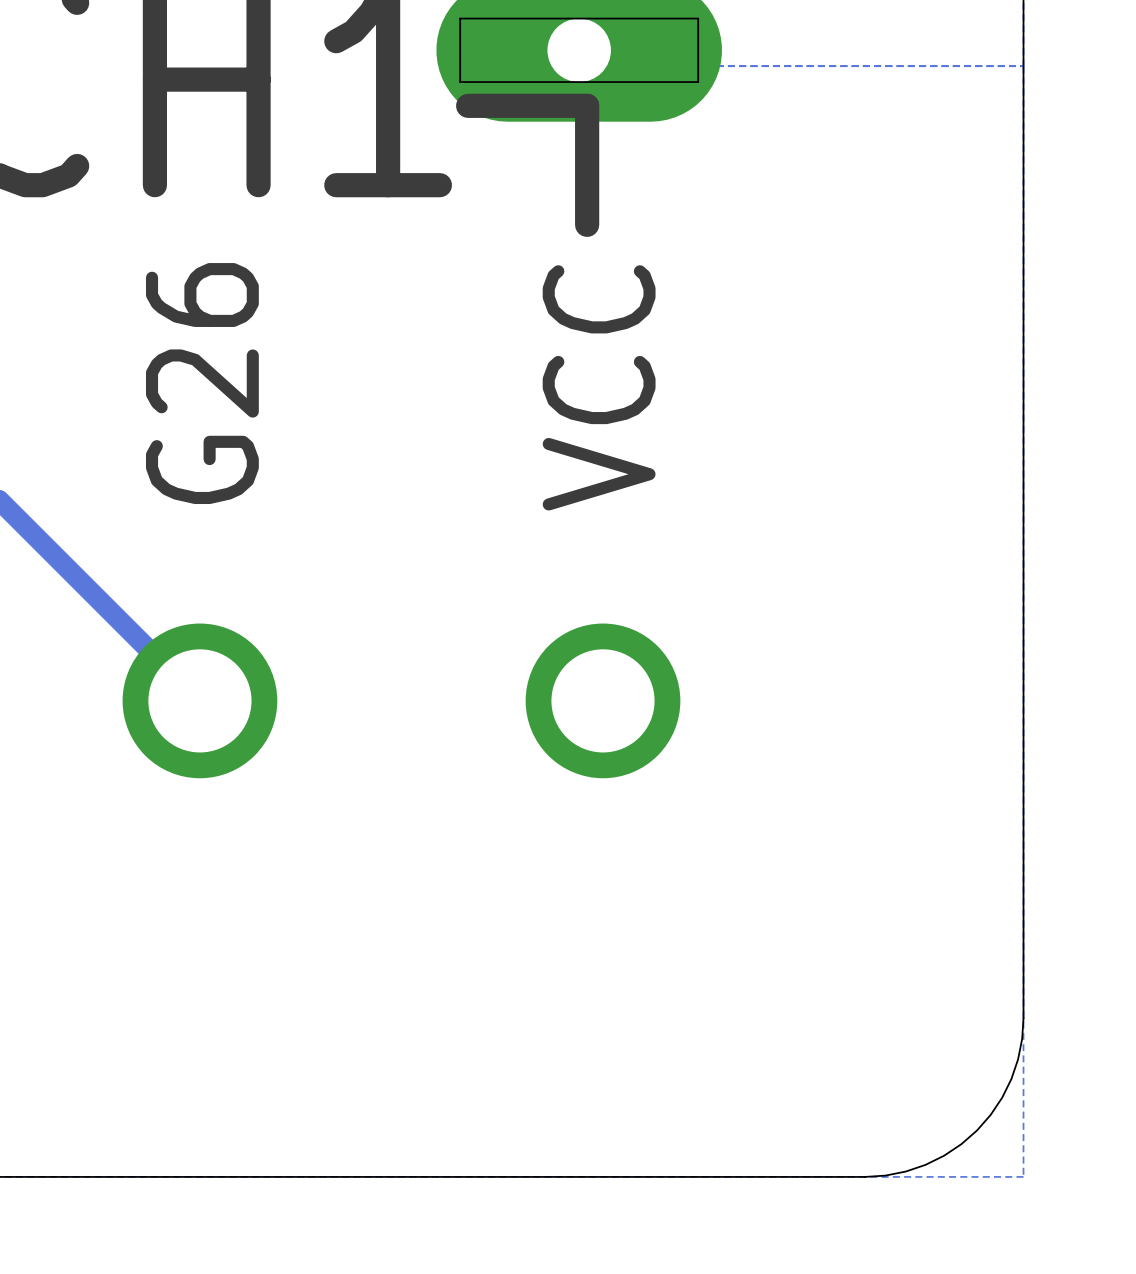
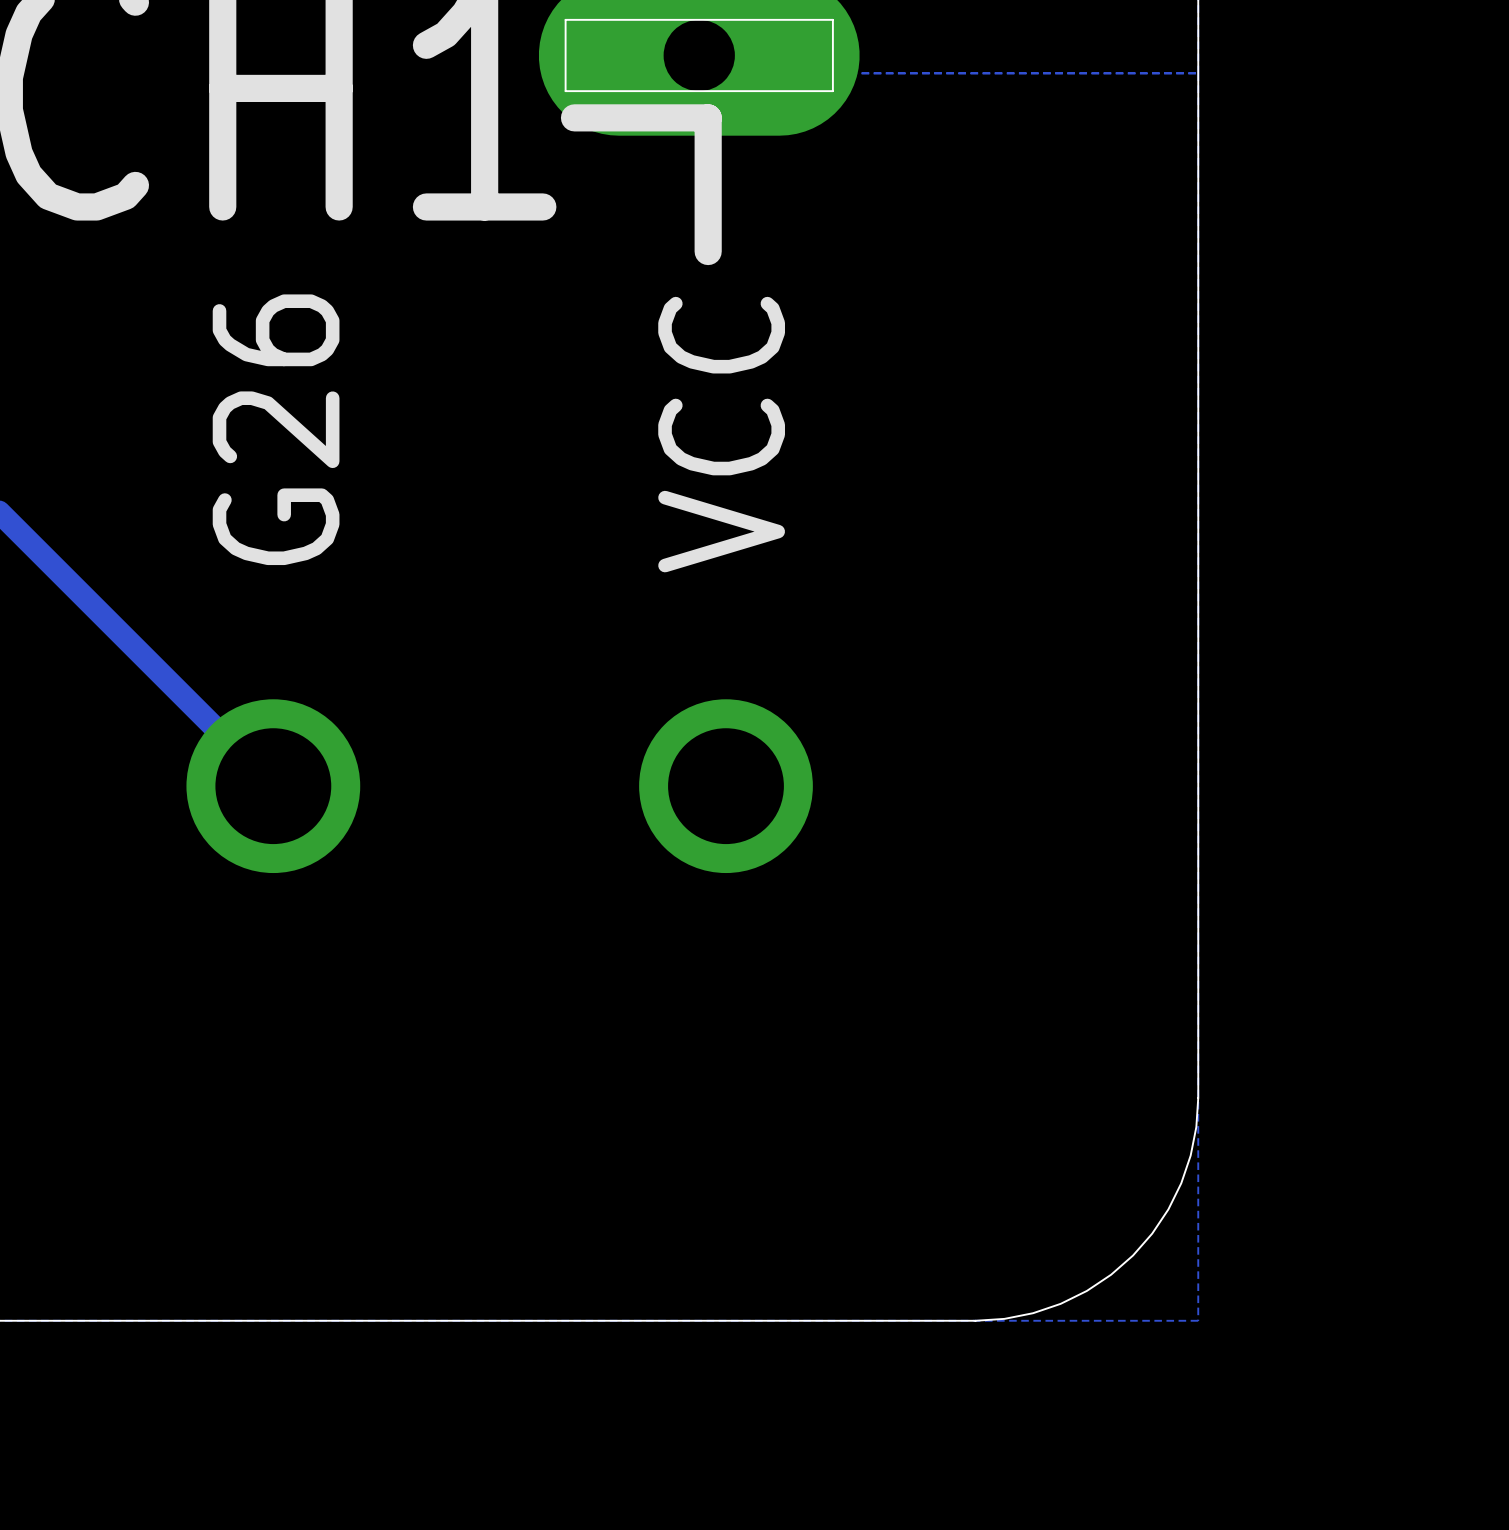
board edge: (1023, 978) (1022, 1038) (1018, 1059) (1002, 1097) (977, 1130) (944, 1155) (905, 1171) (885, 1175) (825, 1176) -> (1198, 1098) (1196, 1127) (1190, 1155) (1181, 1183) (1168, 1209) (1152, 1233) (1133, 1255) (1111, 1274) (1086, 1290) (1060, 1303) (1033, 1313) (1004, 1318) (975, 1320)

